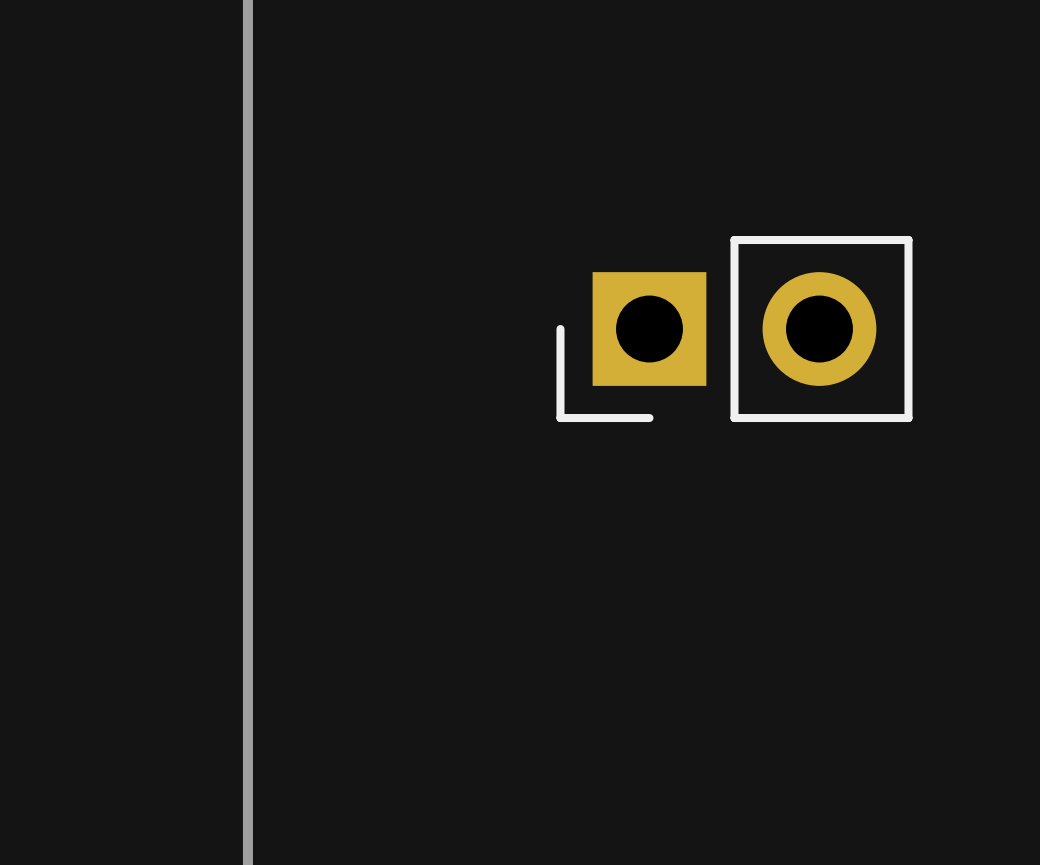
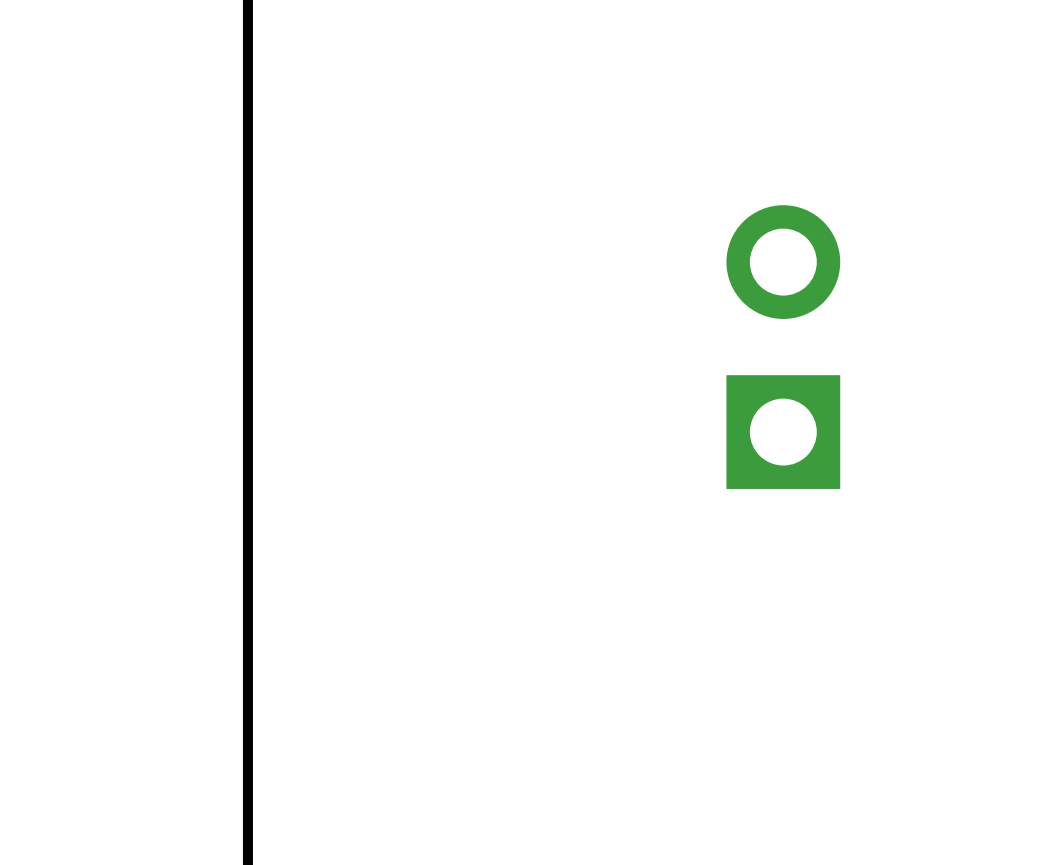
part side: bottom (734, 329) -> top (783, 347)

